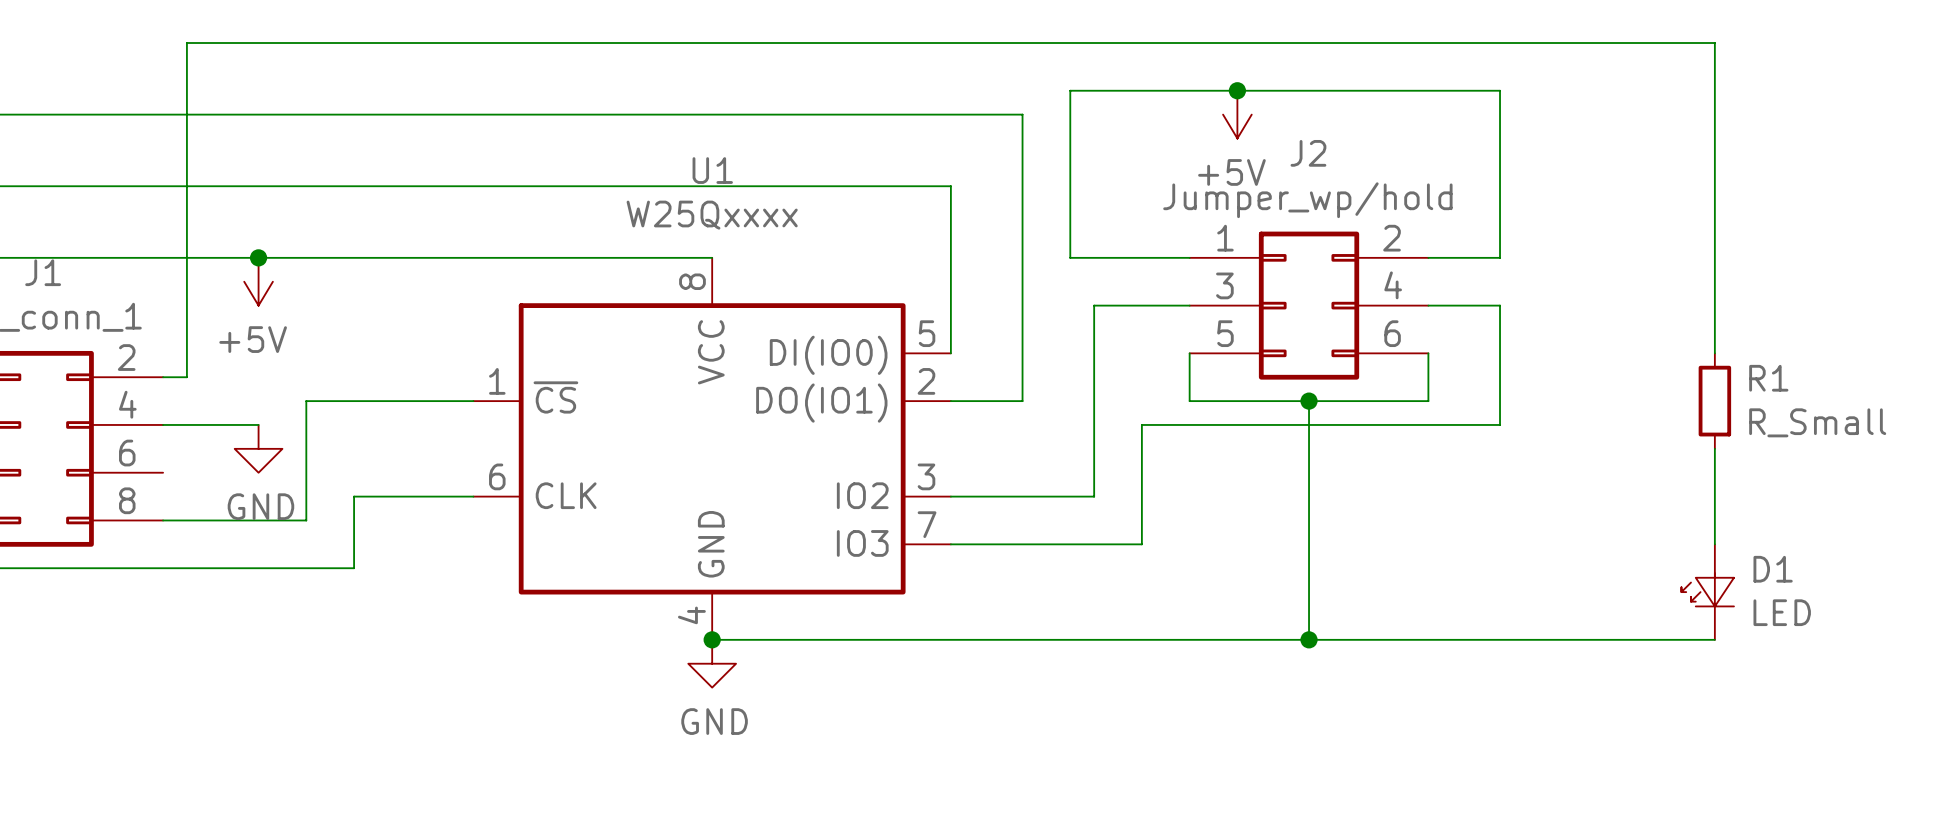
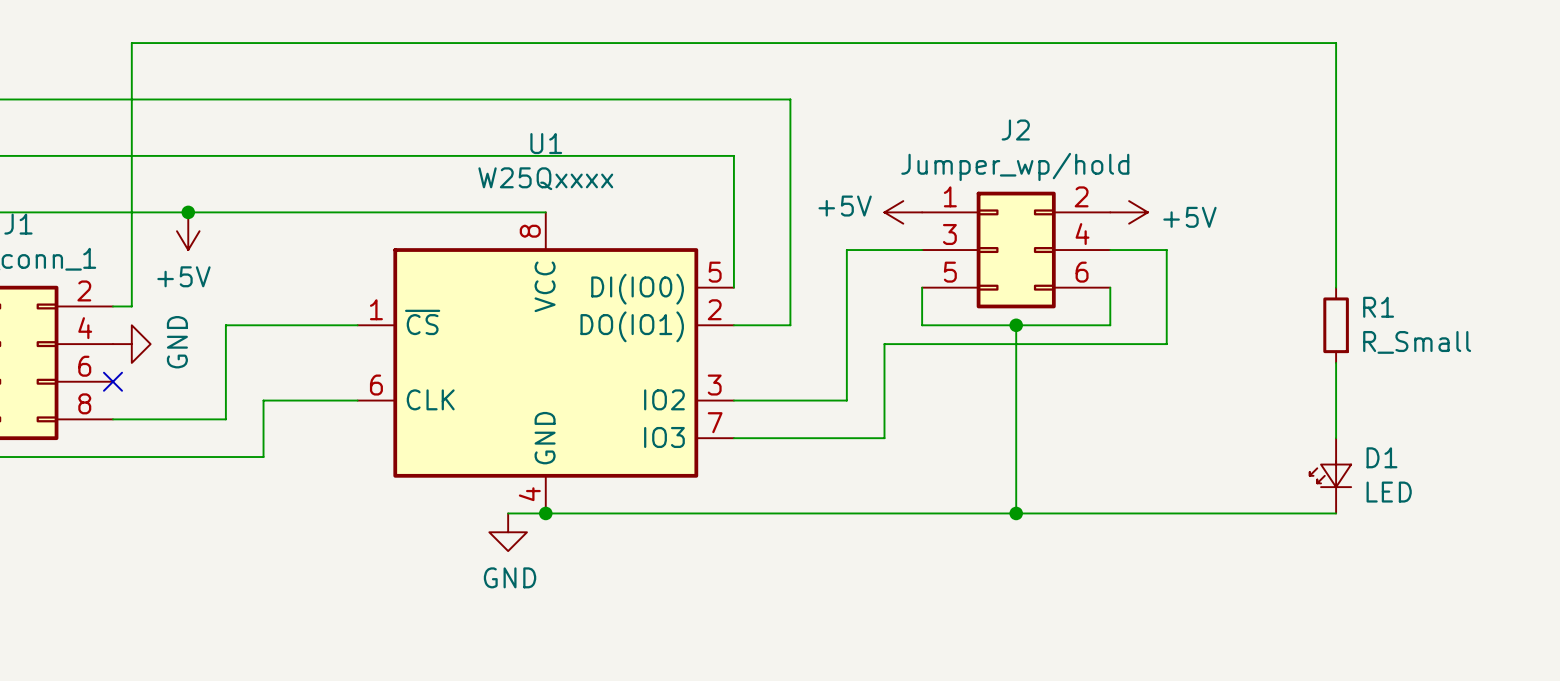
junction: (1237, 90) -> none
power symbol: +5V (1237, 114) -> none
power symbol: none -> +5V (903, 212)
wire: (1189, 257) (1070, 257) (1070, 90) (1500, 90) (1500, 257) (1428, 257) -> none
power symbol: none -> +5V (1129, 212)
wire: (163, 424) (258, 424) -> none
power symbol rotation: 0° (258, 448) -> 90° counterclockwise (131, 344)
power symbol position: GND (258, 448) -> GND (131, 344)
no-connect mark: none -> (112, 381)
wire: none -> (508, 513) (545, 513)
power symbol position: GND (712, 663) -> GND (508, 532)

